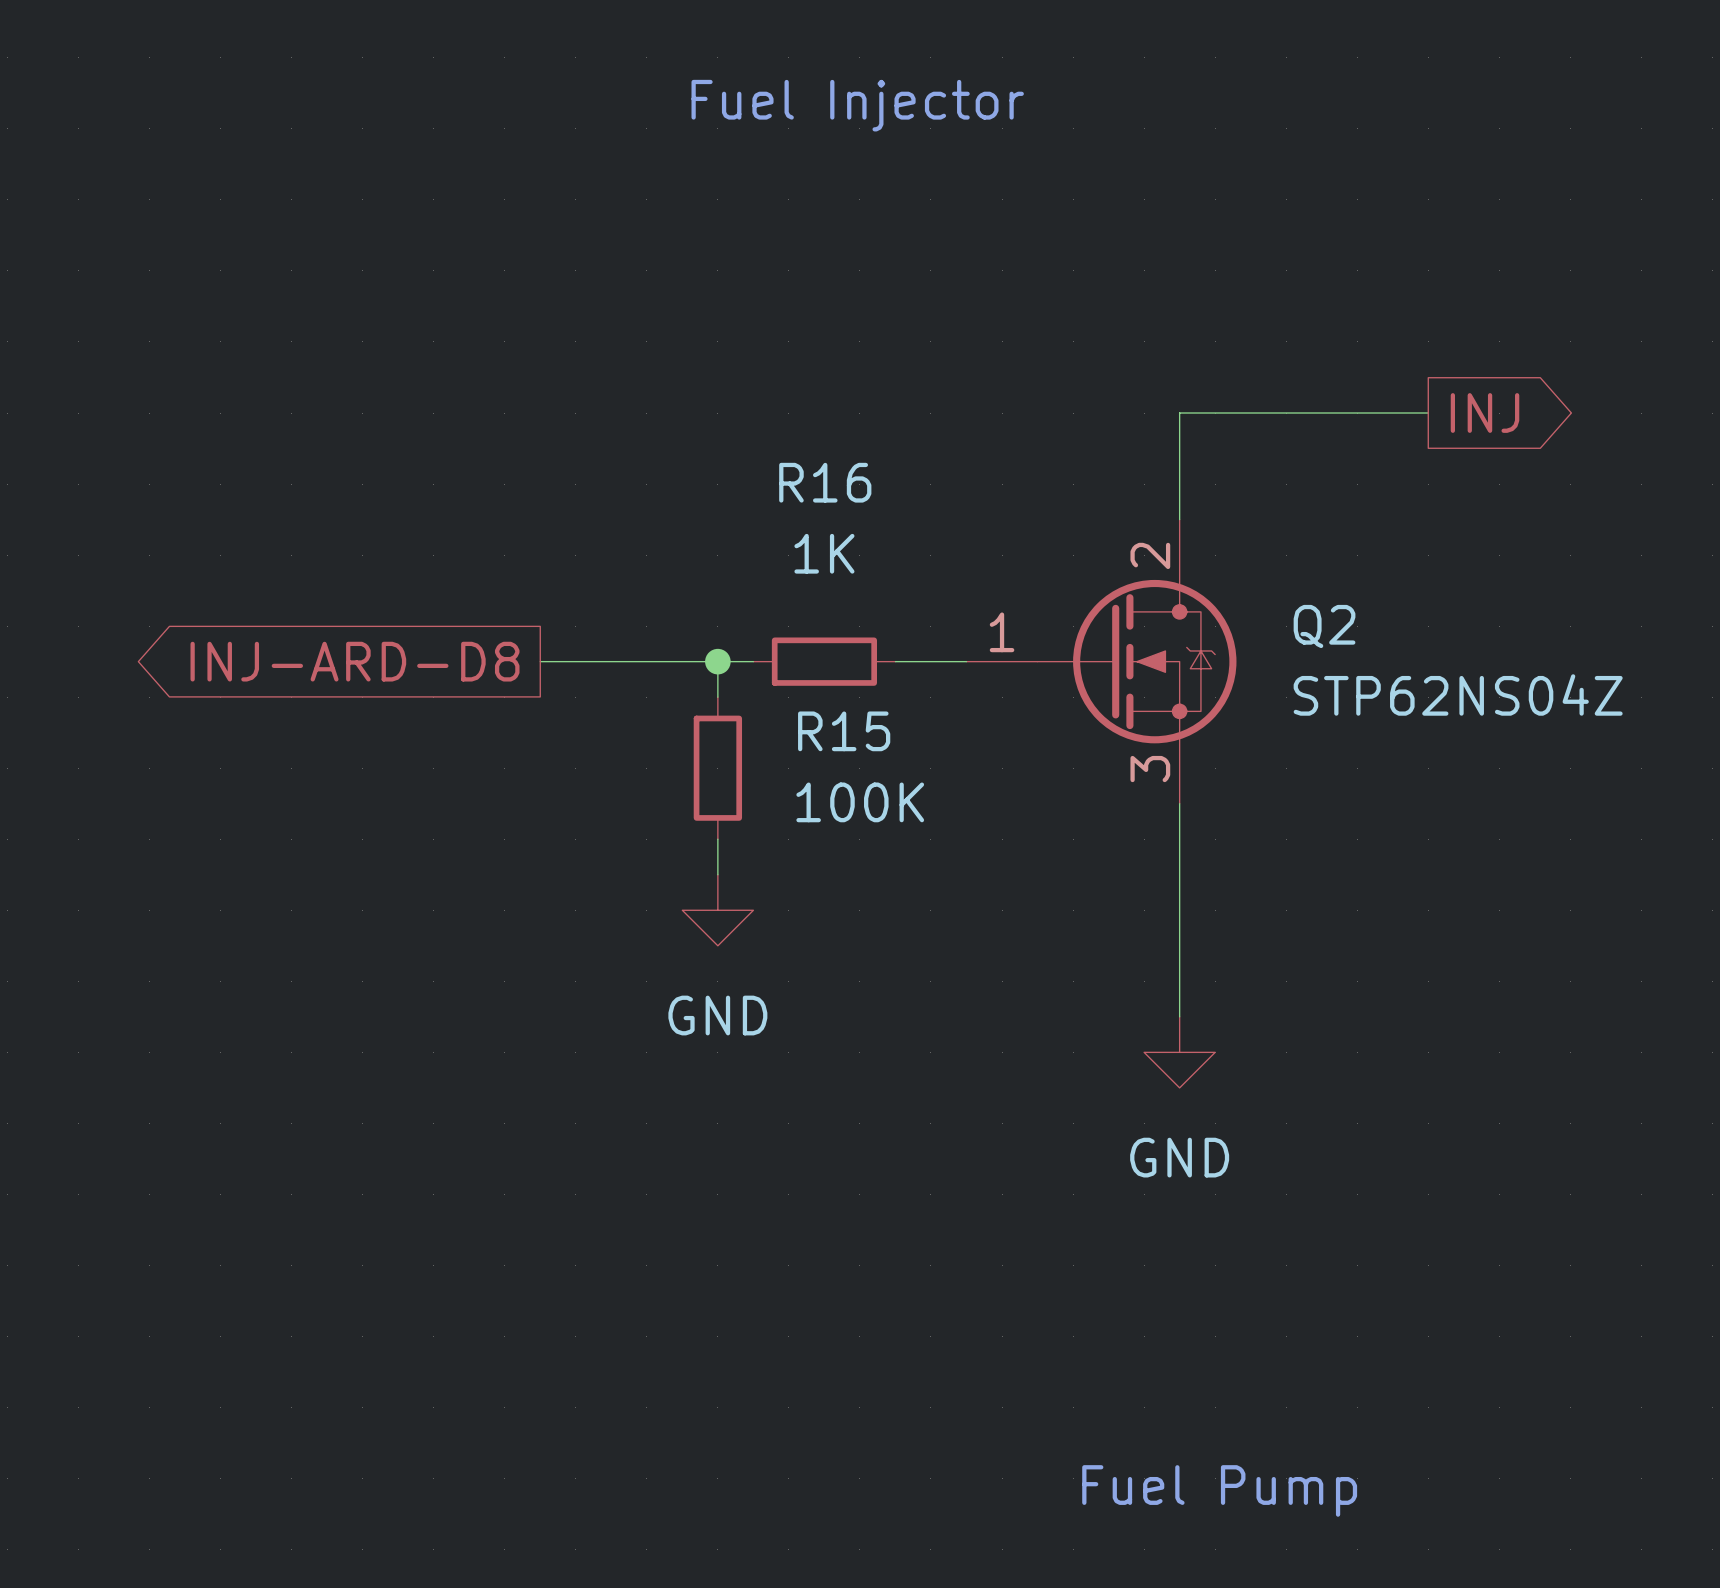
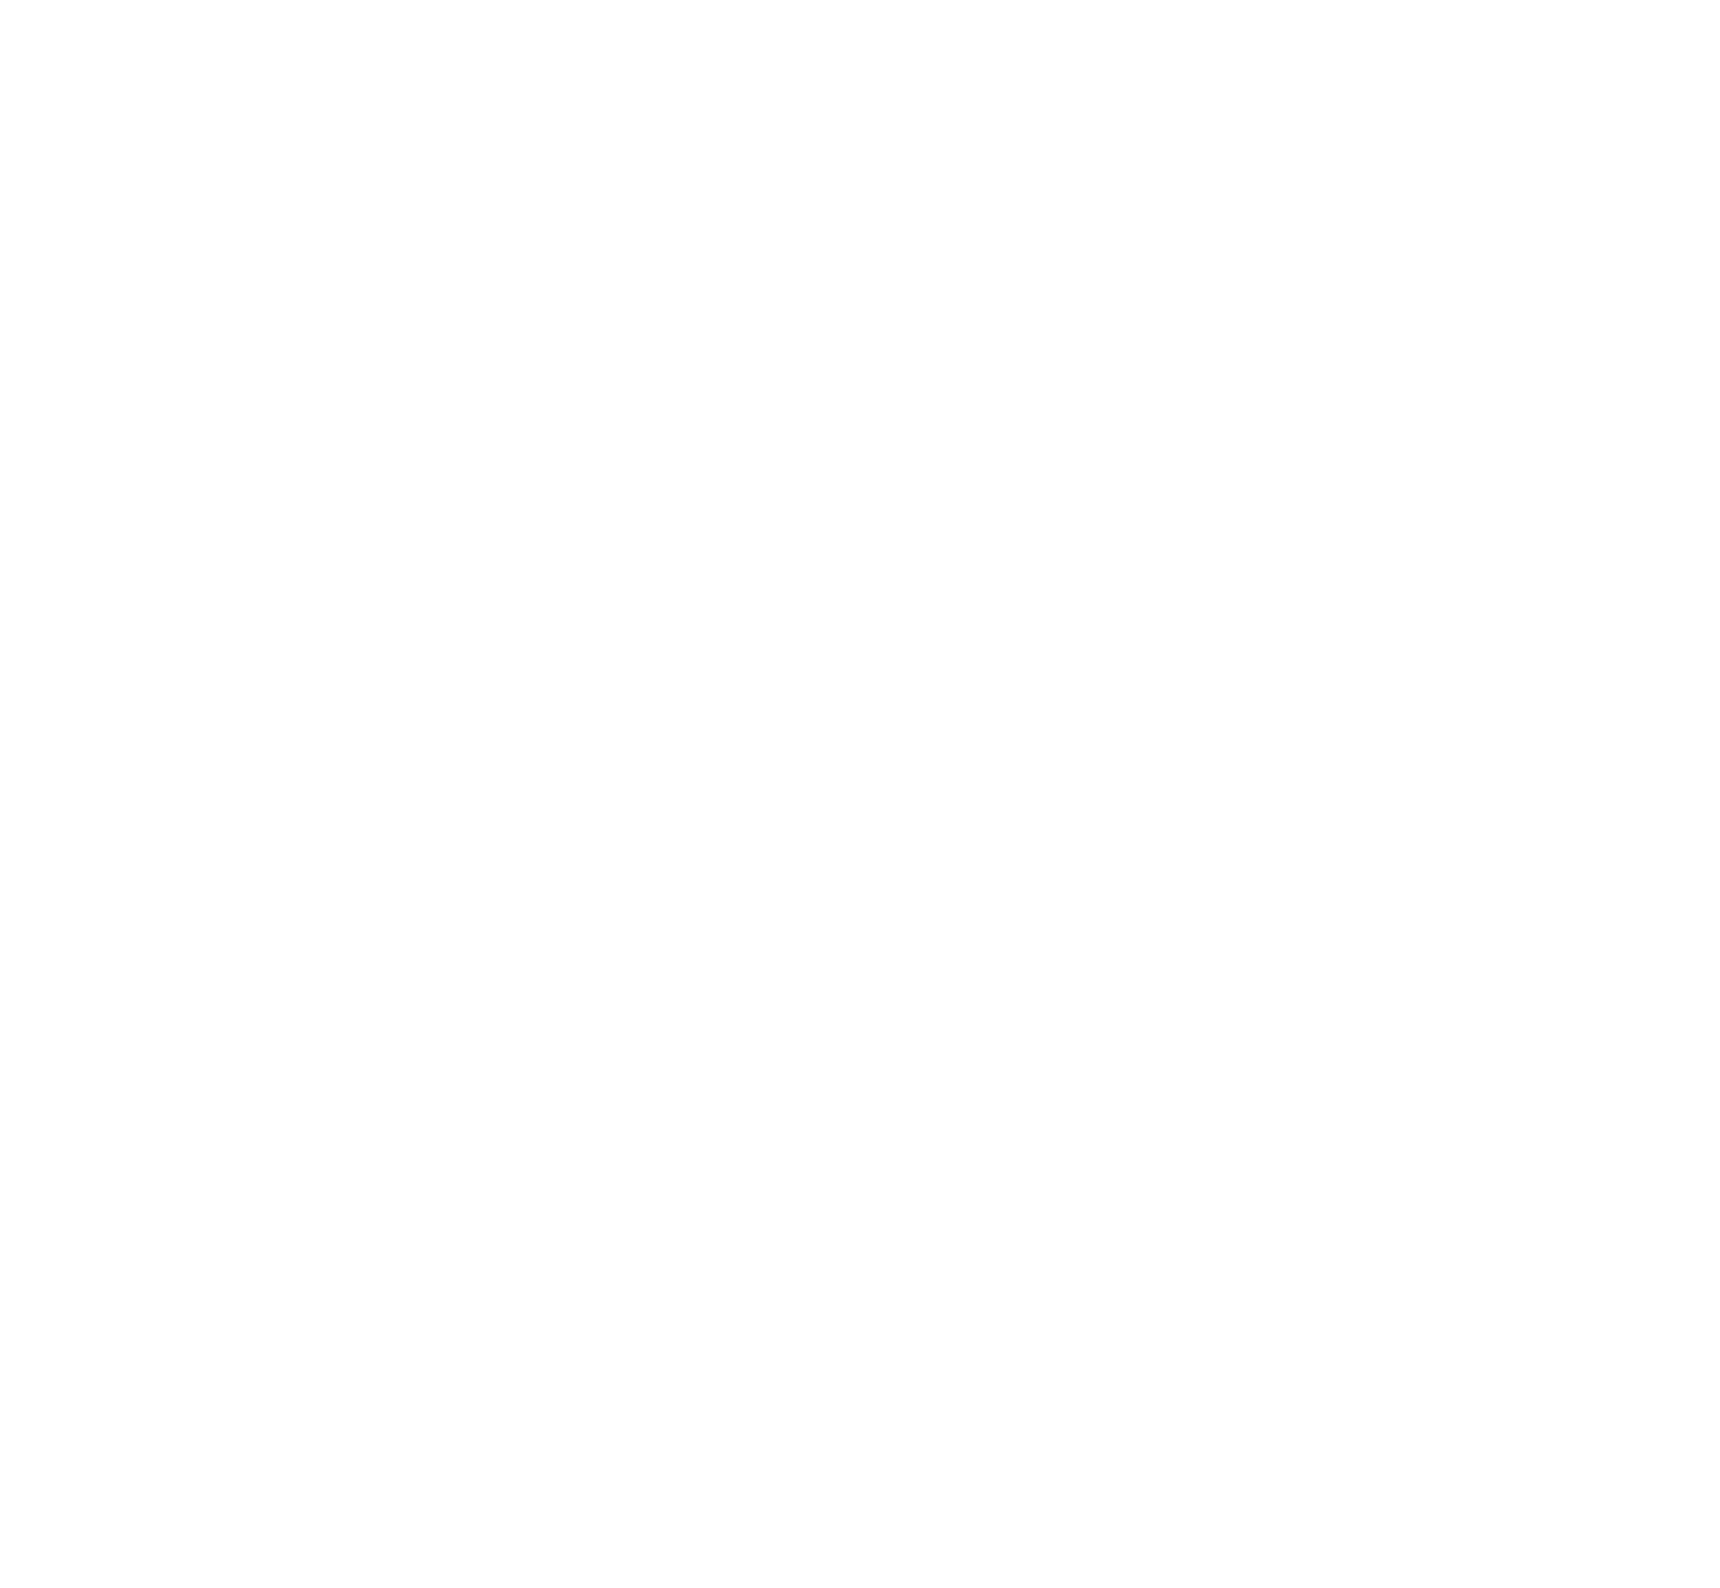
text: Fuel Injector (857, 105) -> none
wire: (1428, 413) (1179, 413) (1179, 519) -> none
global label: INJ (1485, 413) -> none
global label: INJ-ARD-D8 (355, 661) -> none
wire: (540, 661) (753, 661) -> none
wire: (717, 661) (717, 697) -> none
junction: (717, 661) -> none
R16: 1K (824, 661) -> none
wire: (895, 661) (966, 661) -> none
Q2: STP62NS04Z (1101, 661) -> none
R15: 100K (717, 768) -> none
wire: (1179, 803) (1179, 1016) -> none
wire: (717, 839) (717, 874) -> none
power symbol: GND (717, 910) -> none
power symbol: GND (1179, 1052) -> none
text: Fuel Pump (1219, 1490) -> none

